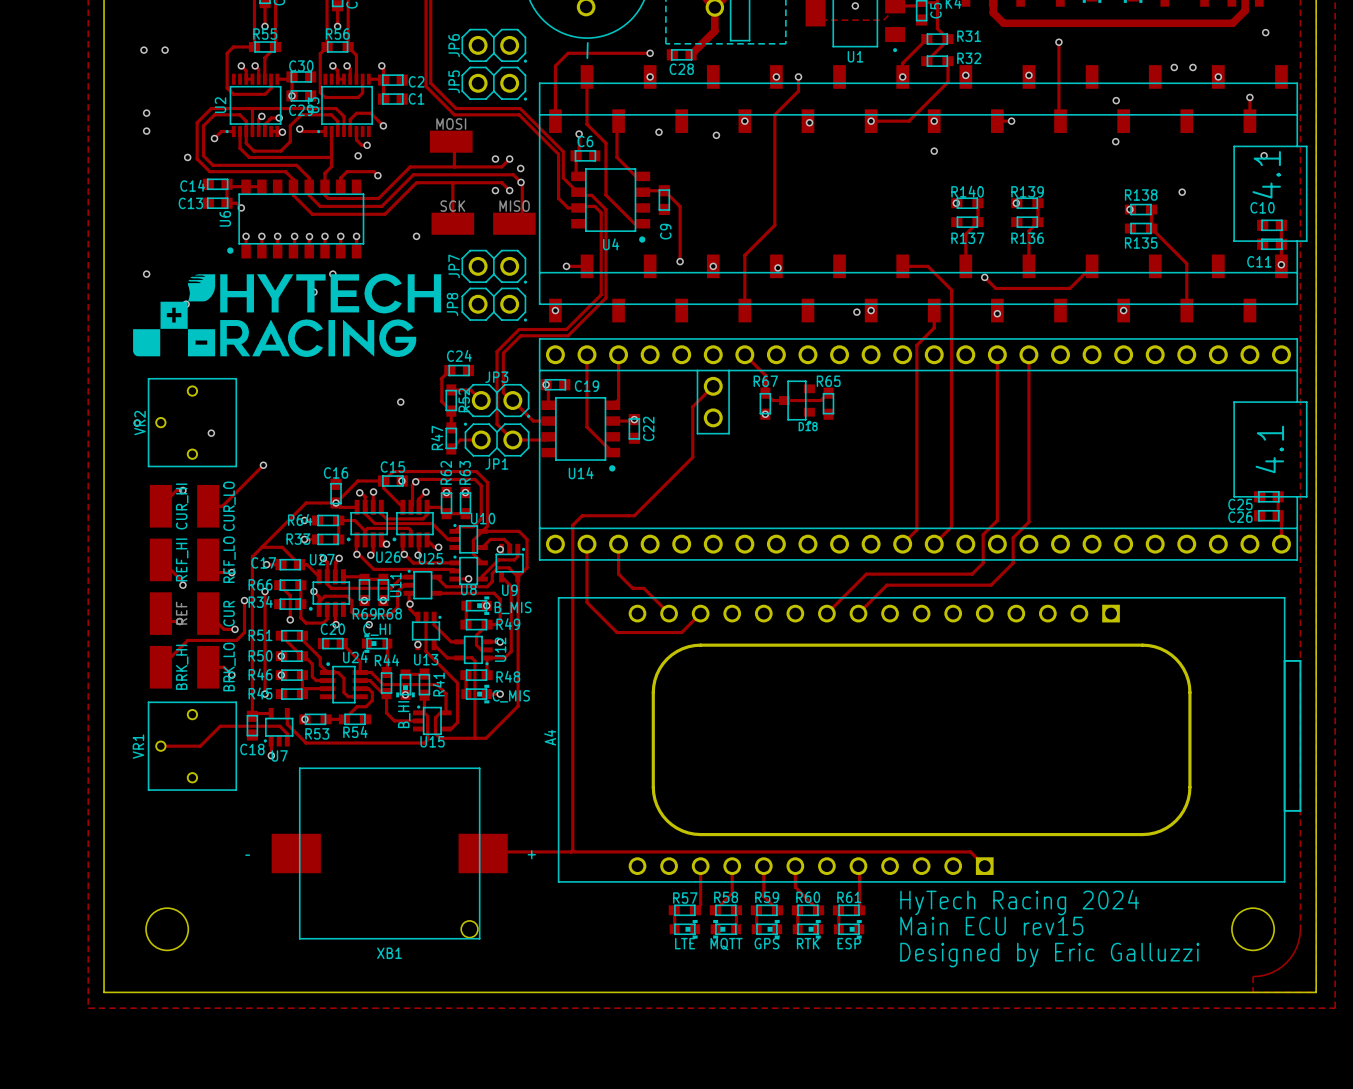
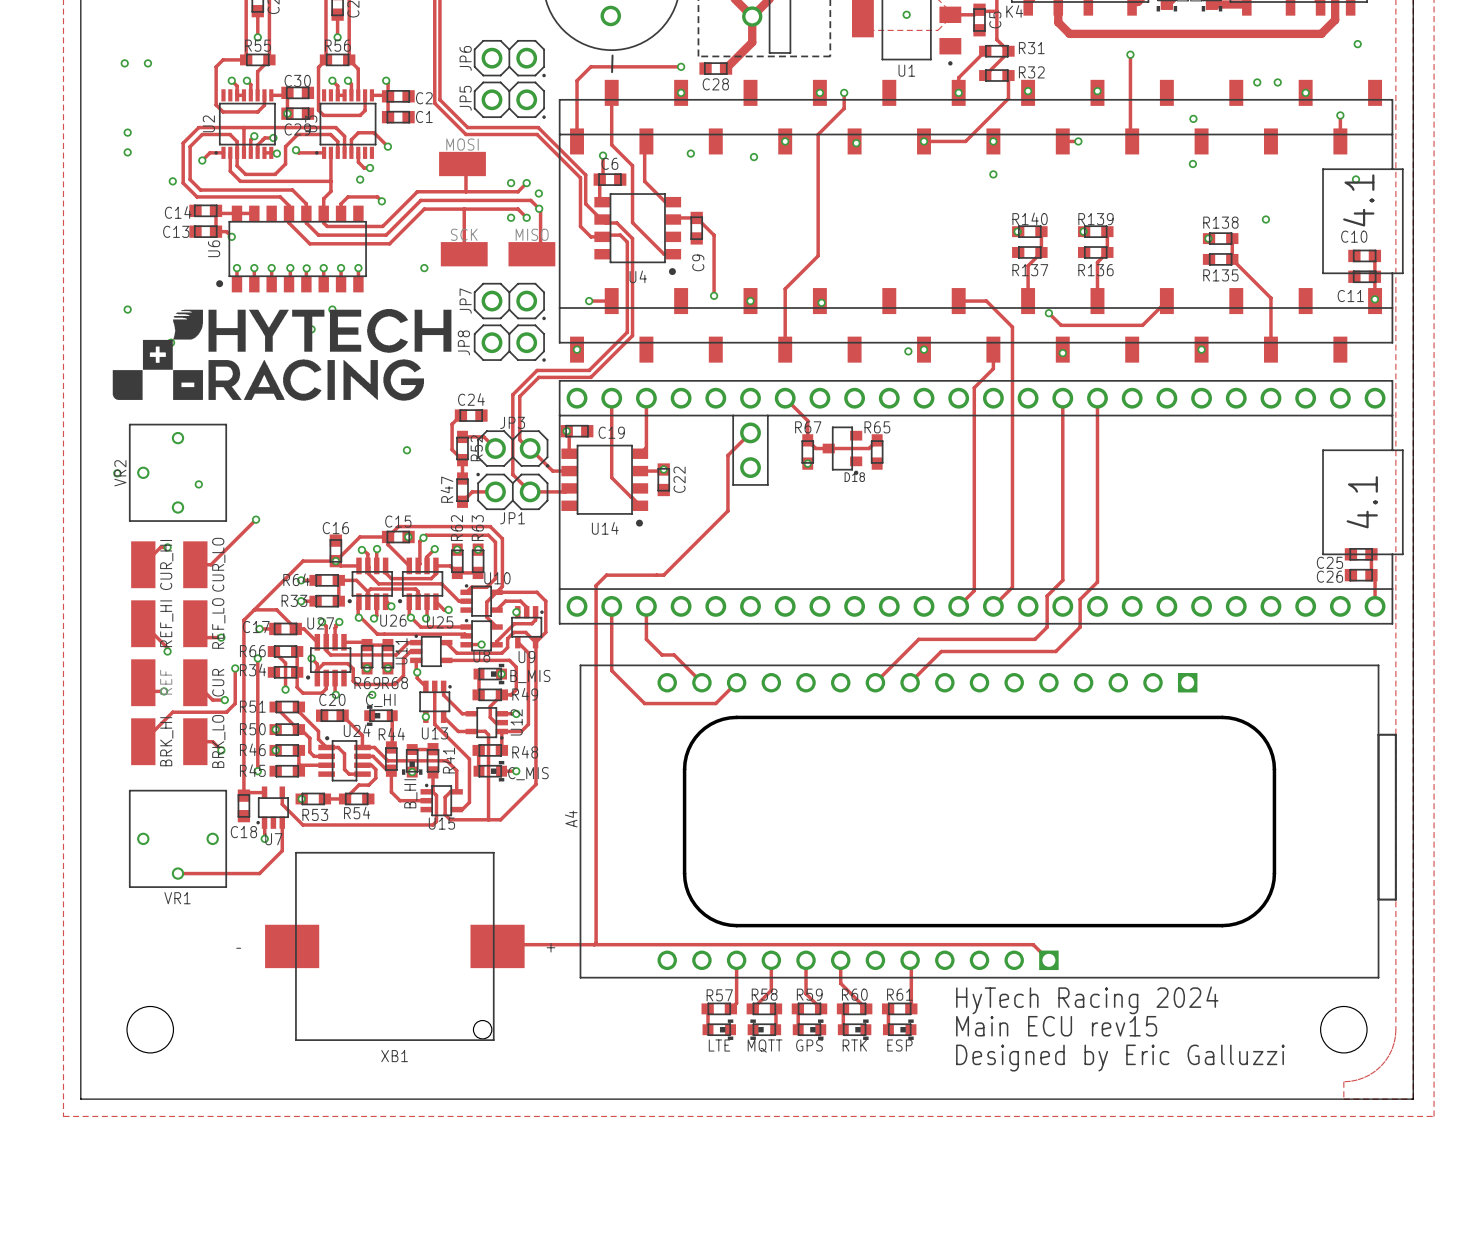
track: (287, 740) (287, 733) (279, 726) (220, 726) (200, 746) (160, 746) -> (282, 822) (282, 850) (259, 873) (177, 873)
VR1 rotation: 0° (192, 746) -> 90° counterclockwise (177, 838)

